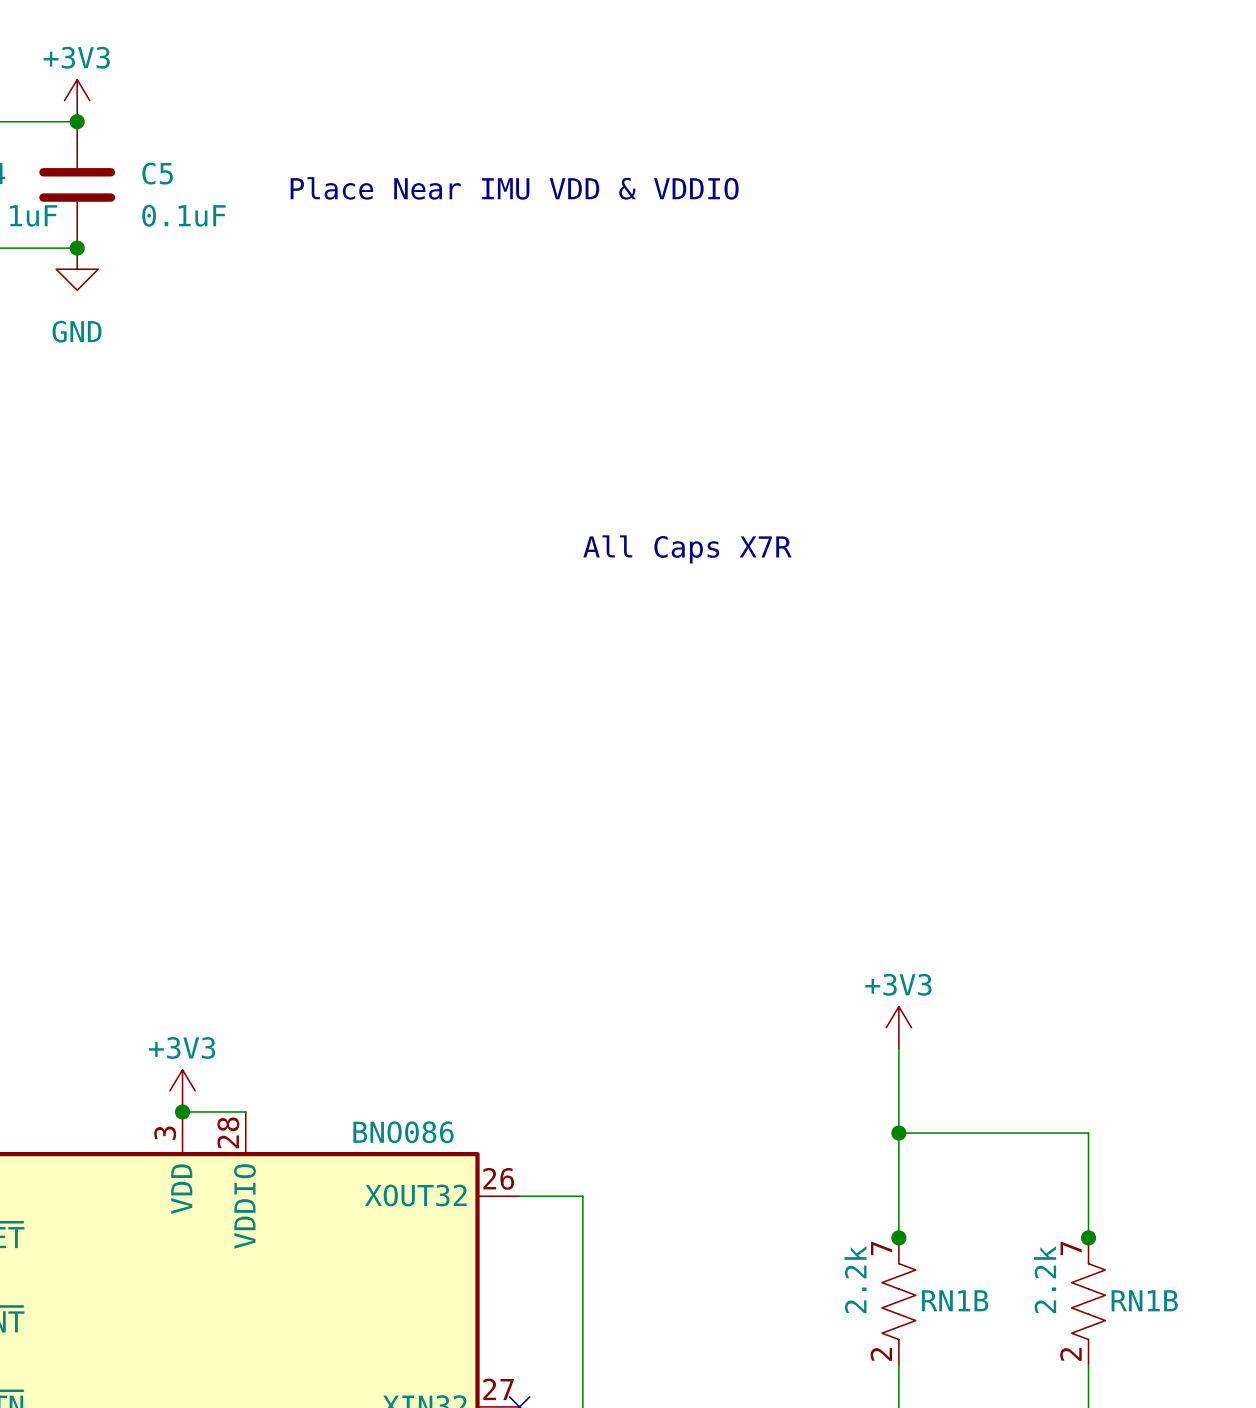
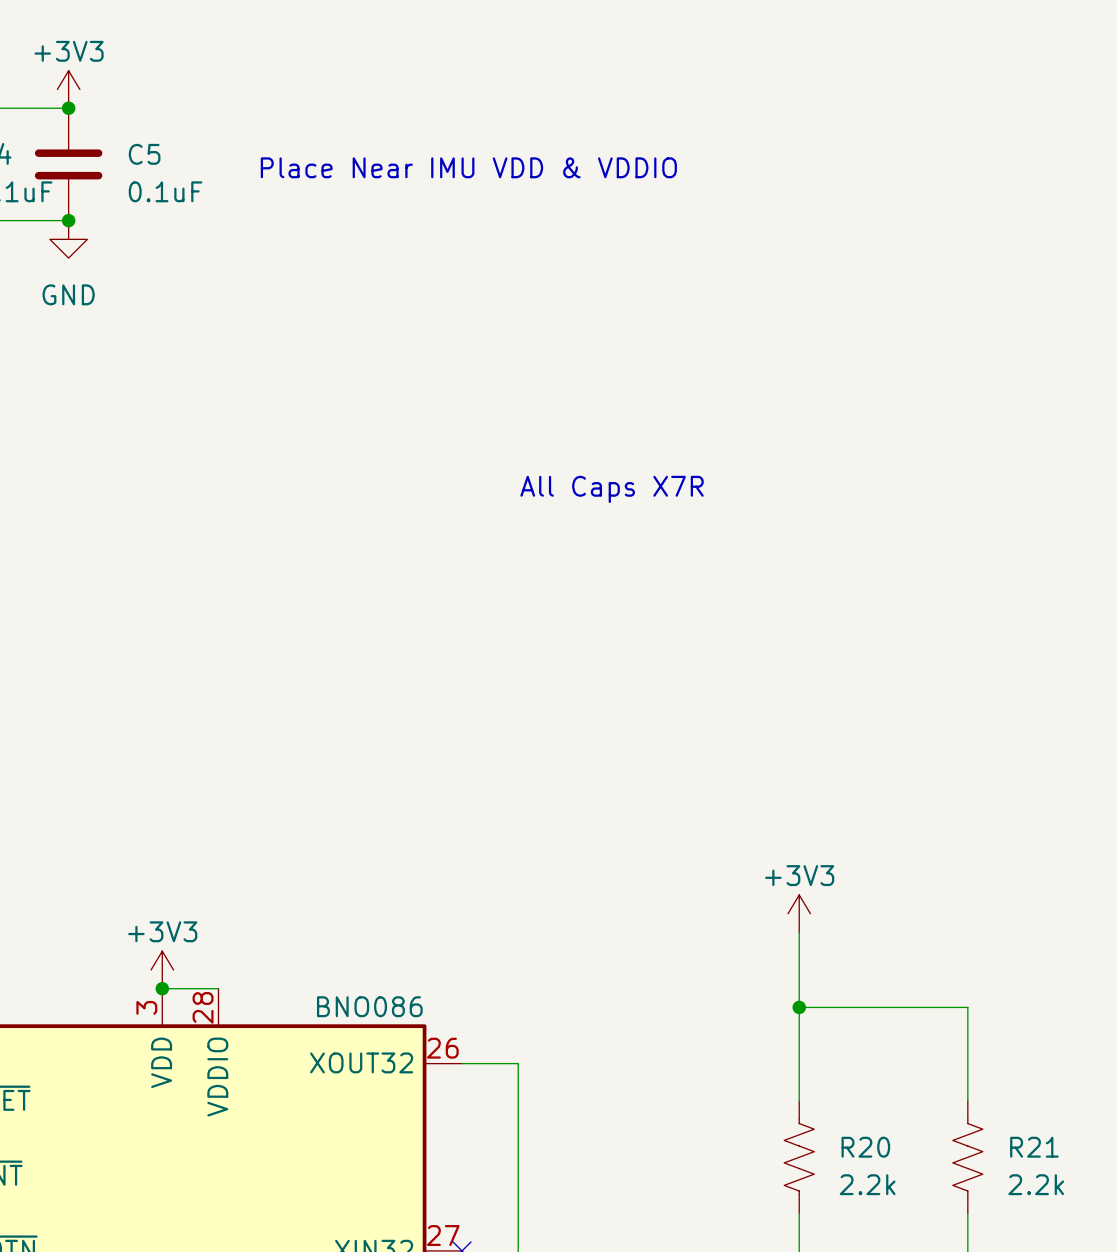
junction: (898, 1237) -> none
junction: (1088, 1237) -> none
RN1B: 2.2k (898, 1301) -> none
R20: none -> 2.2k (799, 1157)
RN1B: 2.2k (1088, 1301) -> none
R21: none -> 2.2k (967, 1157)

